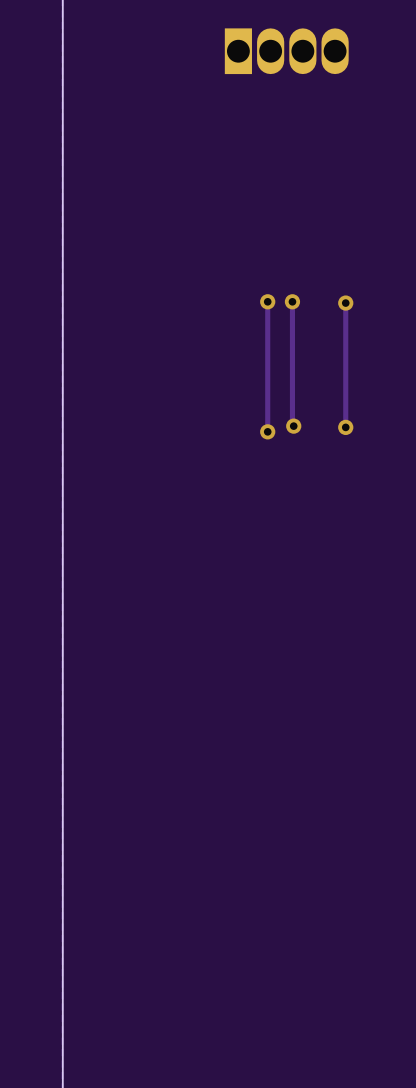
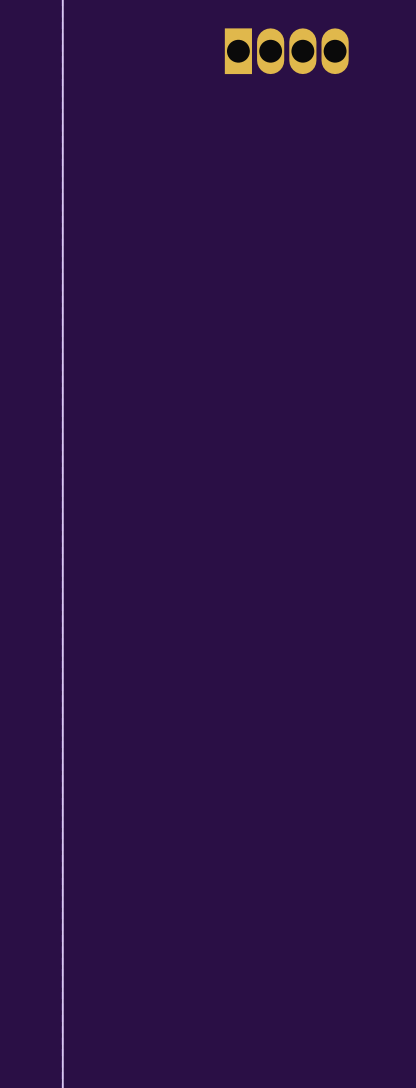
track: (267, 301) (267, 431) -> none
via: (267, 301) -> none
track: (292, 301) (293, 426) -> none
via: (292, 301) -> none
track: (345, 303) (345, 427) -> none
via: (345, 303) -> none
via: (293, 426) -> none
via: (345, 427) -> none
via: (267, 431) -> none

